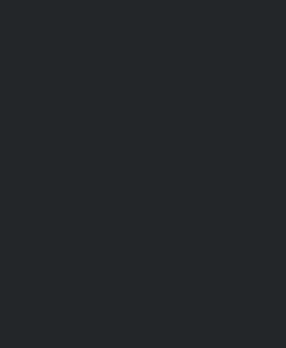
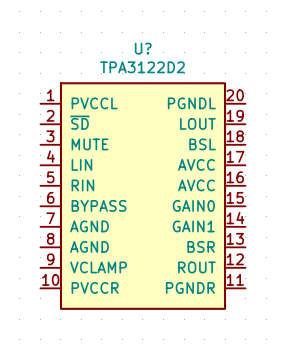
U?: none -> TPA3122D2 (142, 196)

